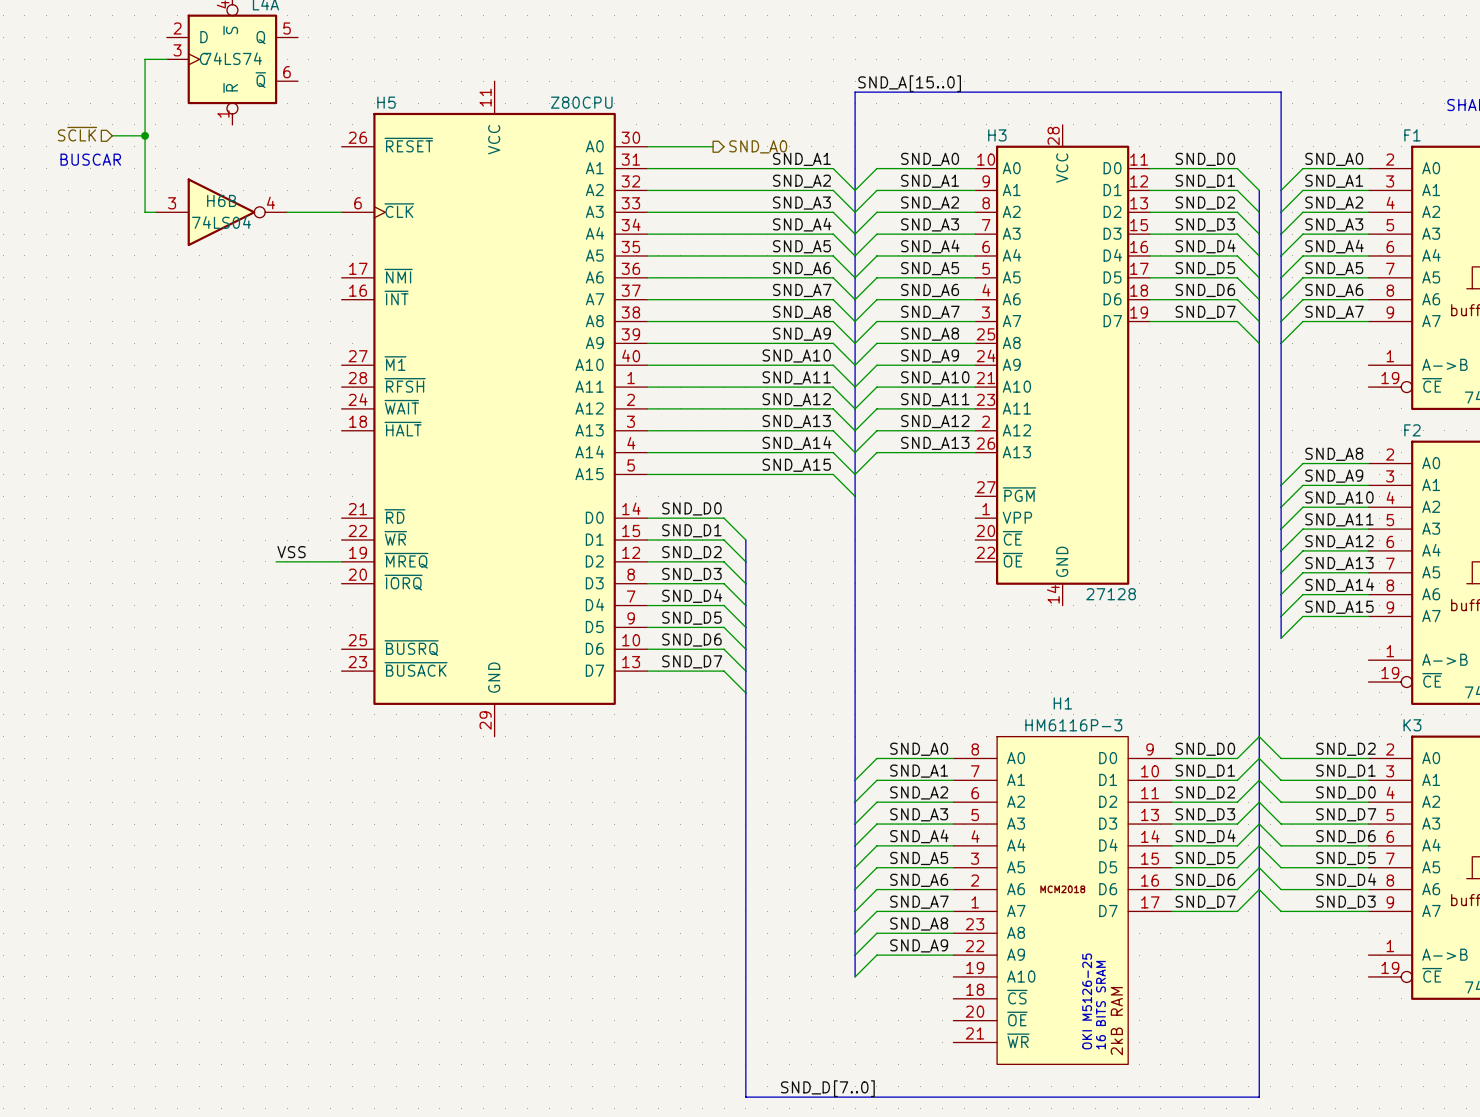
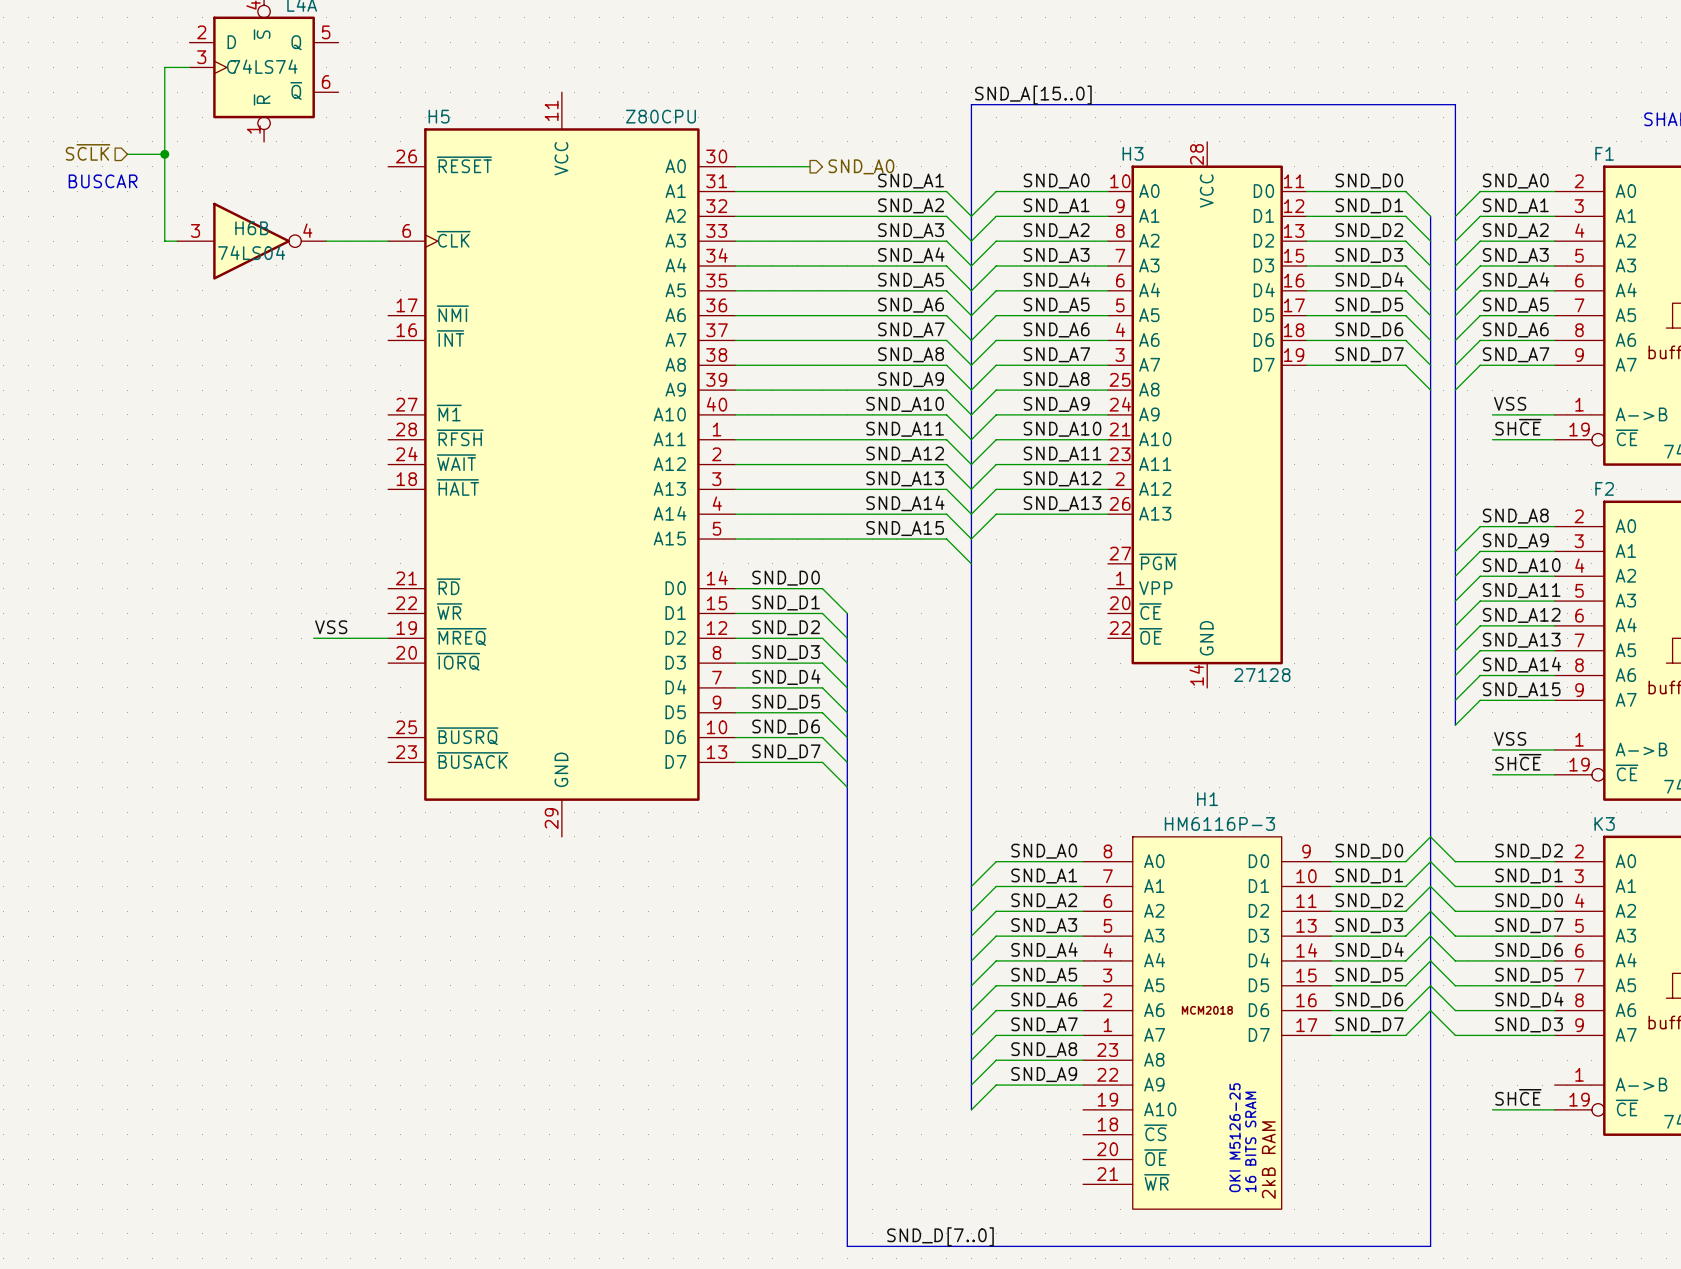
label: none -> VSS (1510, 403)
wire: none -> (1492, 414) (1554, 414)
label: none -> SH~{CE} (1518, 427)
wire: none -> (1492, 439) (1554, 439)
label: none -> VSS (1510, 738)
wire: none -> (1492, 749) (1554, 749)
label: none -> SH~{CE} (1518, 762)
wire: none -> (1492, 774) (1554, 774)
label: none -> SH~{CE} (1518, 1097)
wire: none -> (1492, 1109) (1554, 1109)

